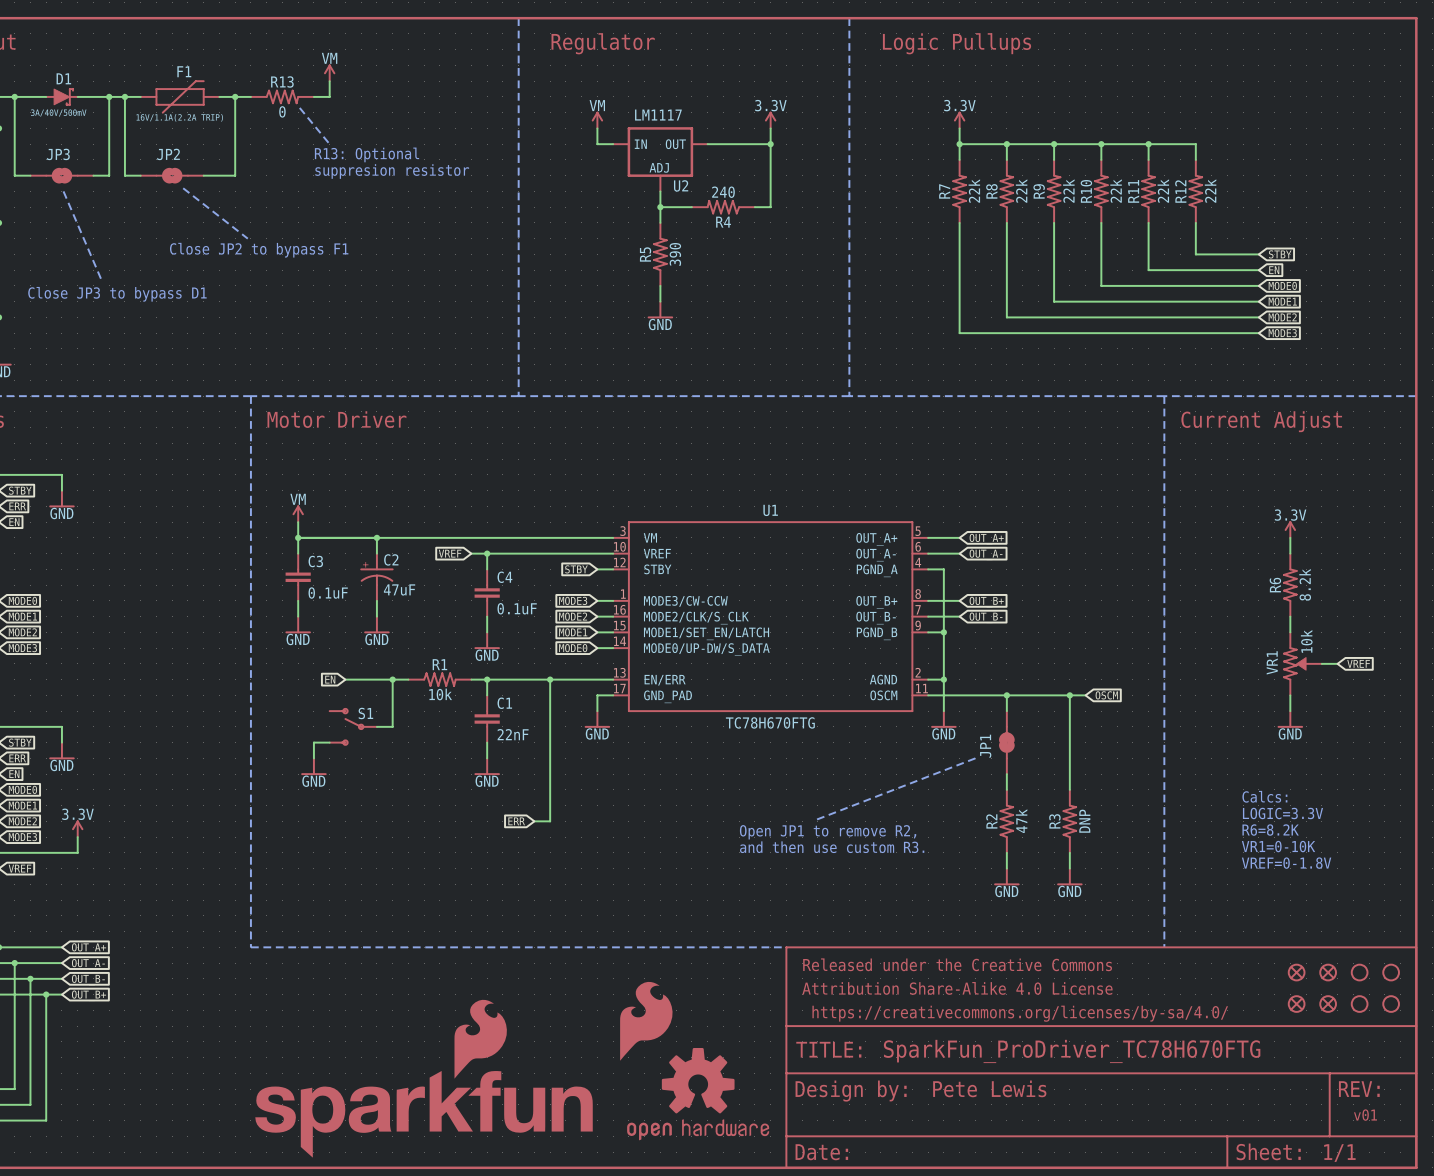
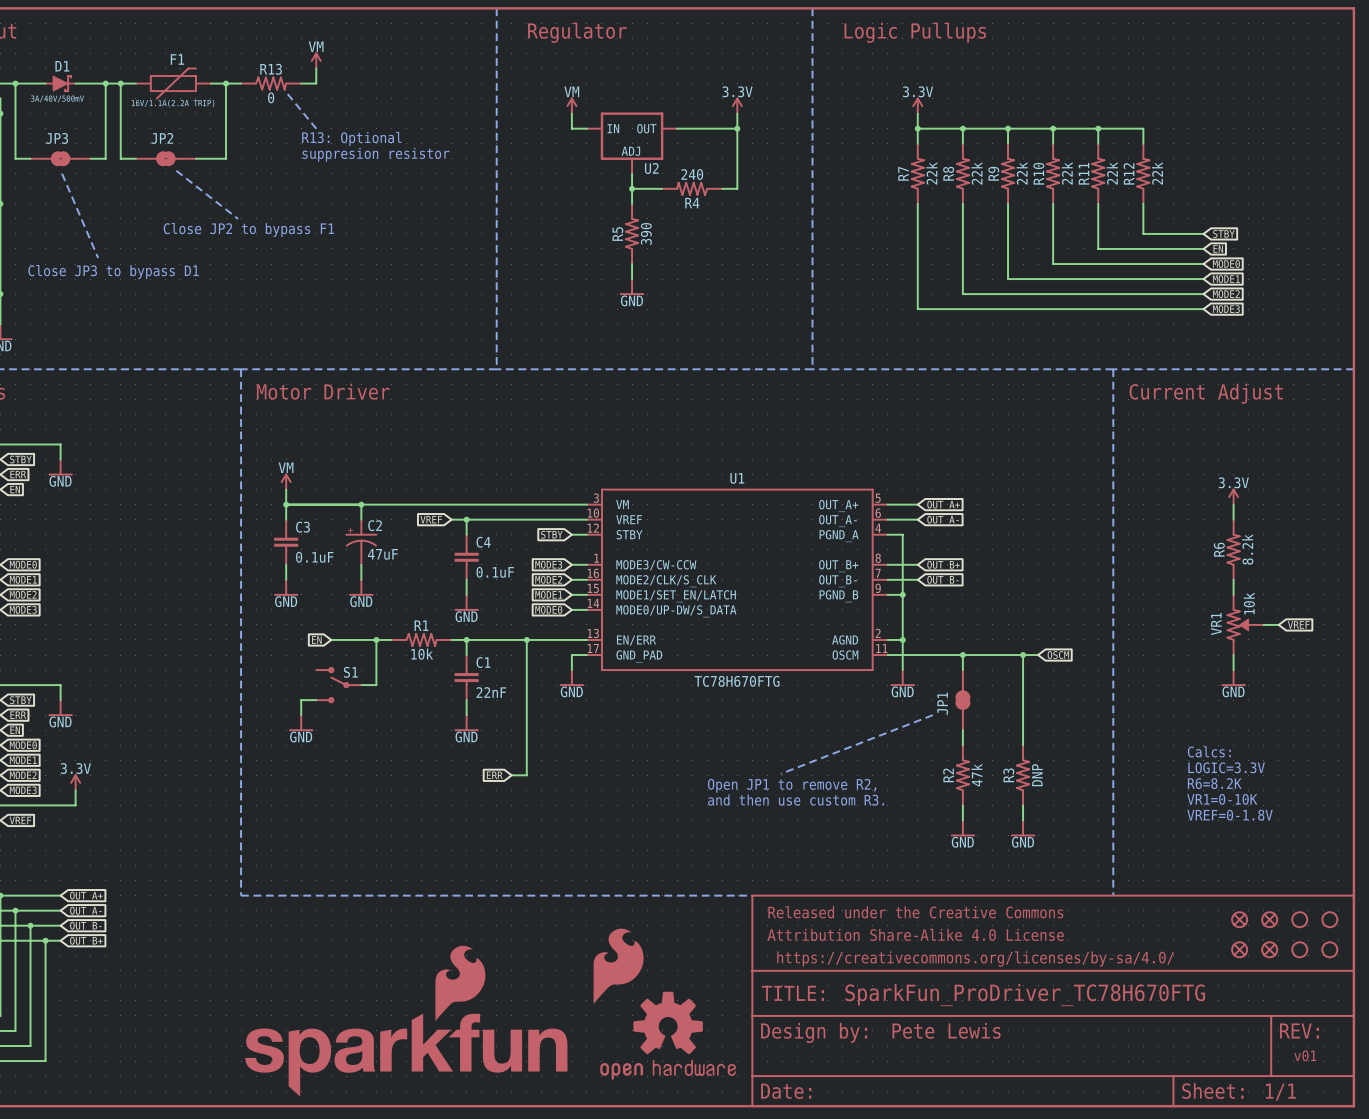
U2 value: LM1117 (658, 115) -> none

